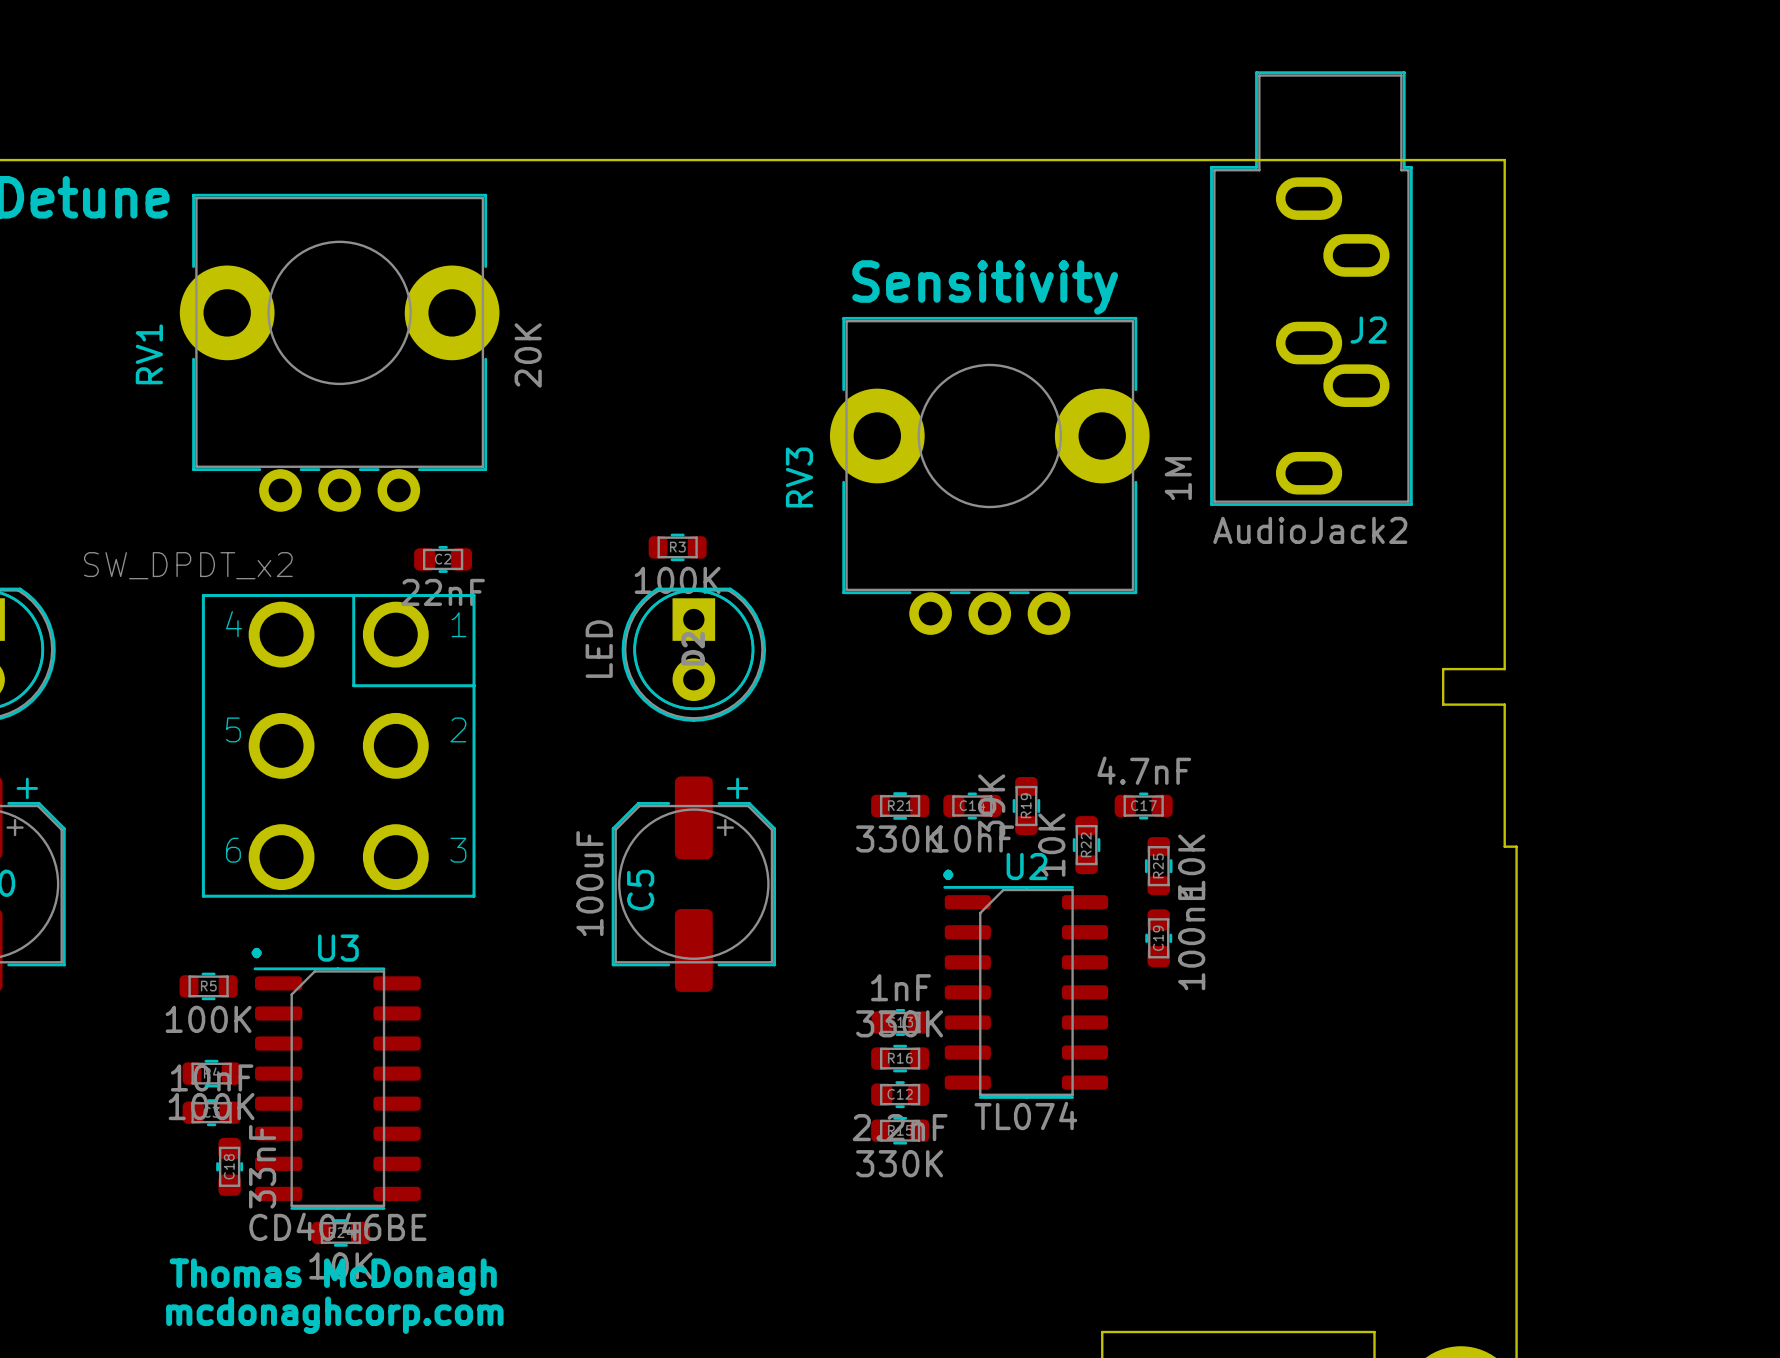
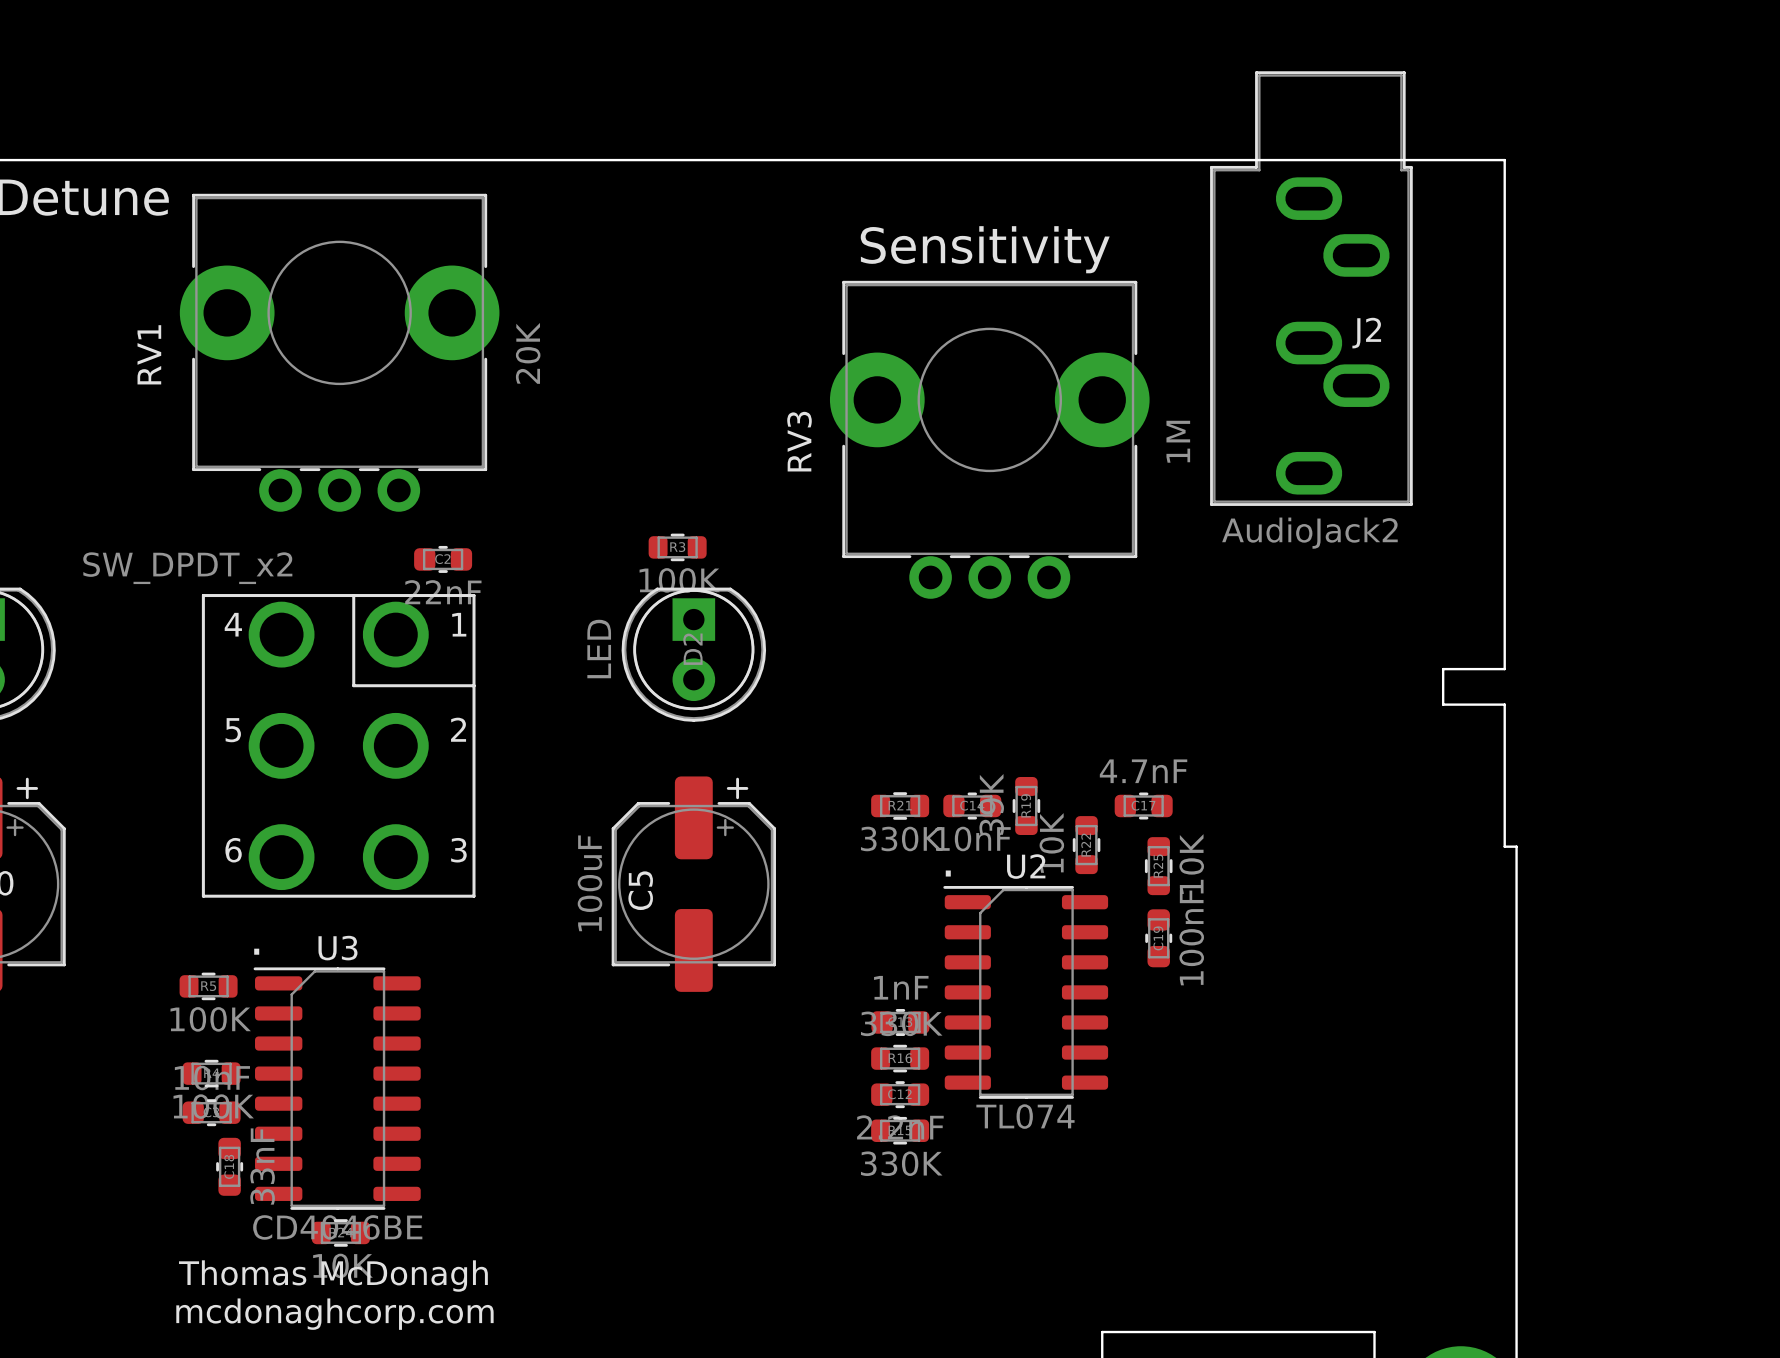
text position: Sensitivity (985, 287) -> Sensitivity (985, 249)
RV3 position: (989, 475) -> (989, 439)

